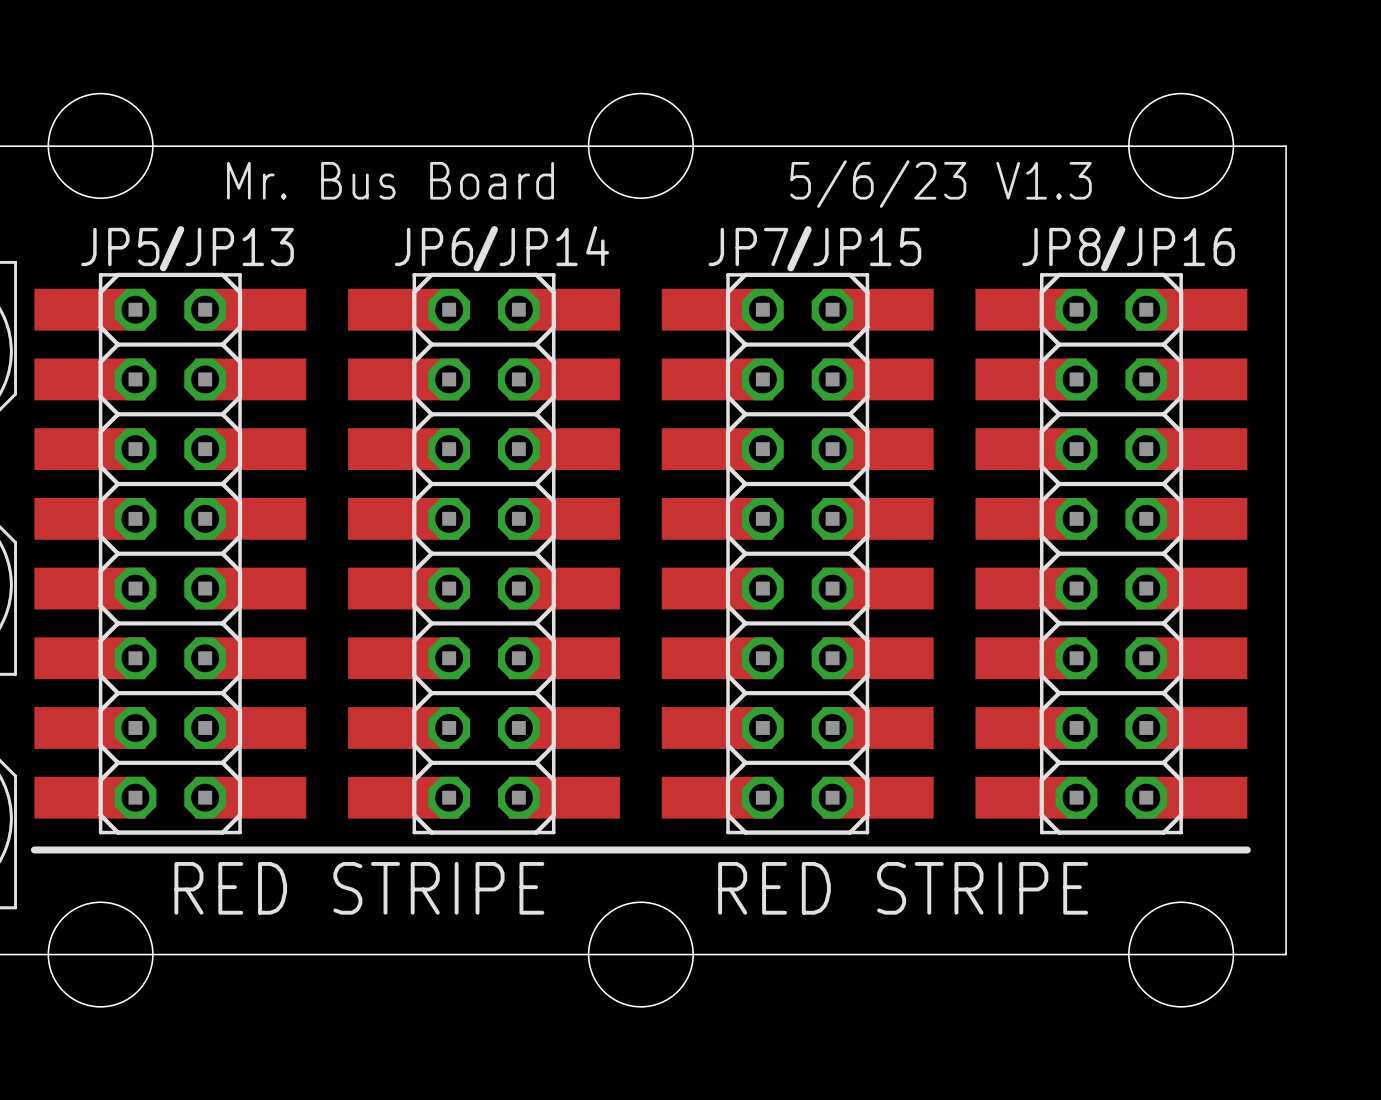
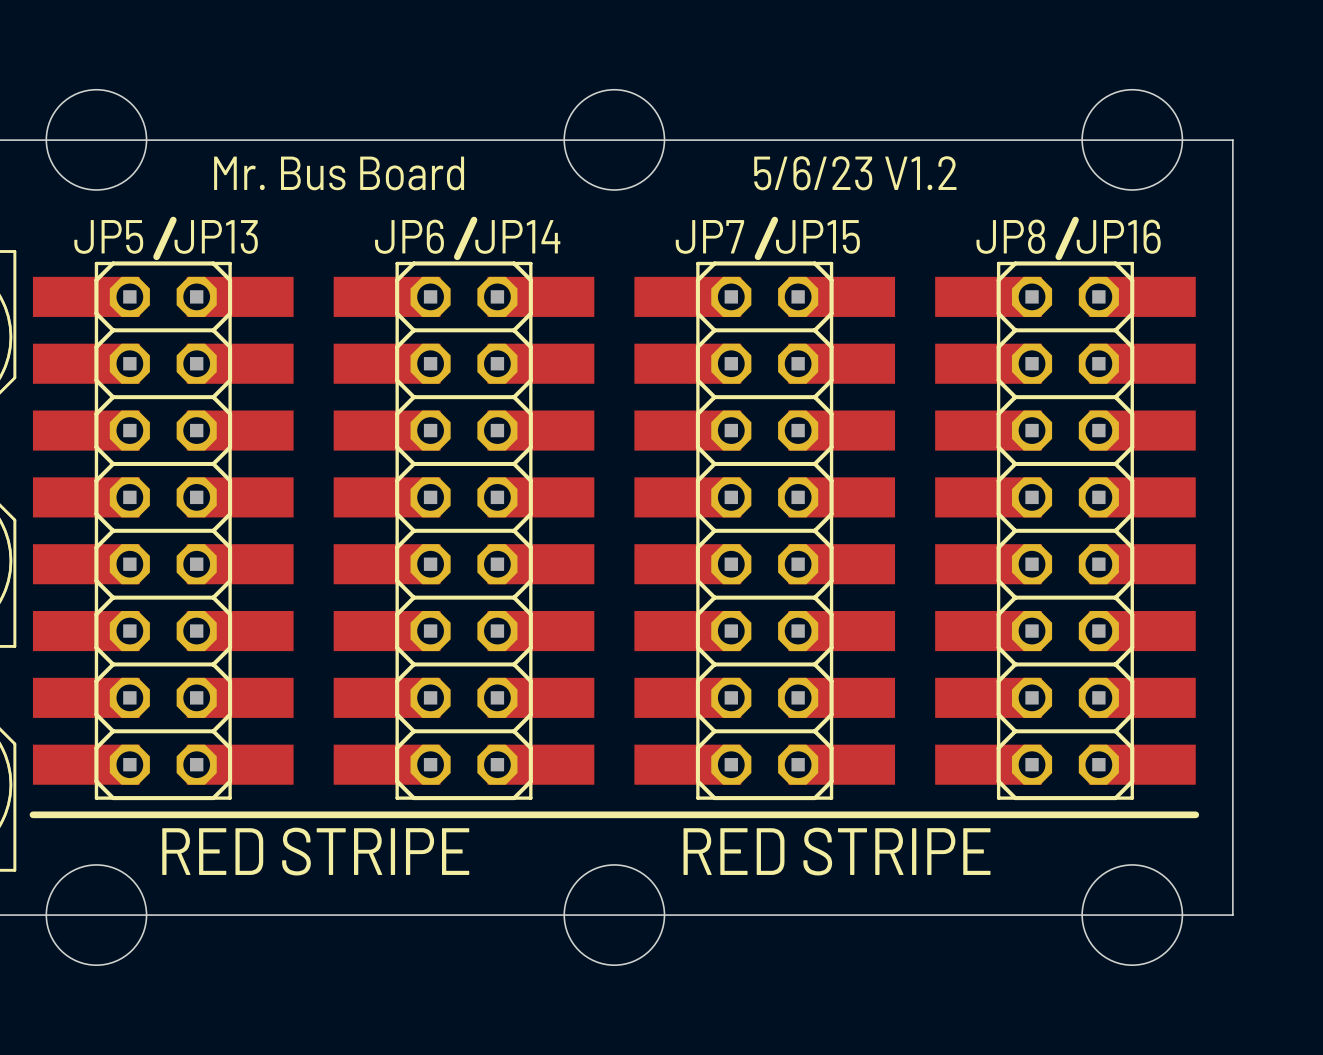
text: 5/6/23 V1.3 (940, 184) -> 5/6/23 V1.2 (855, 173)

